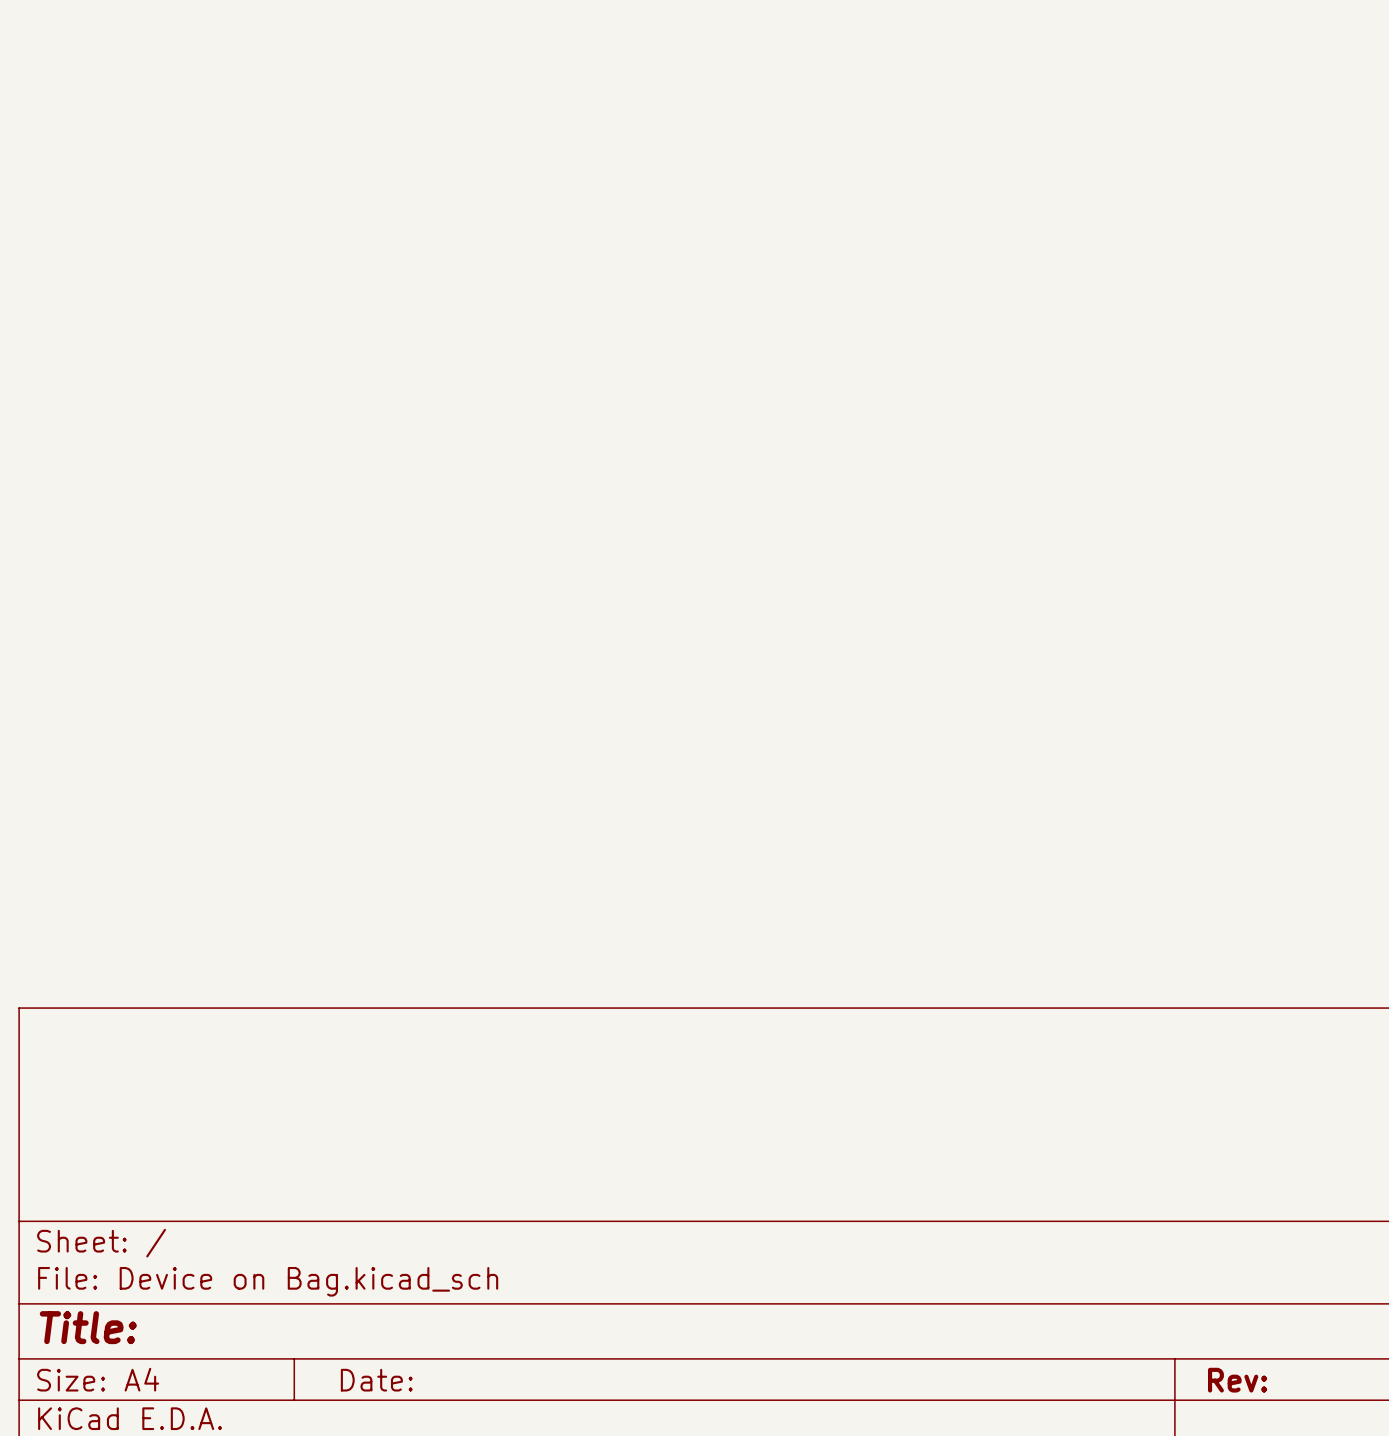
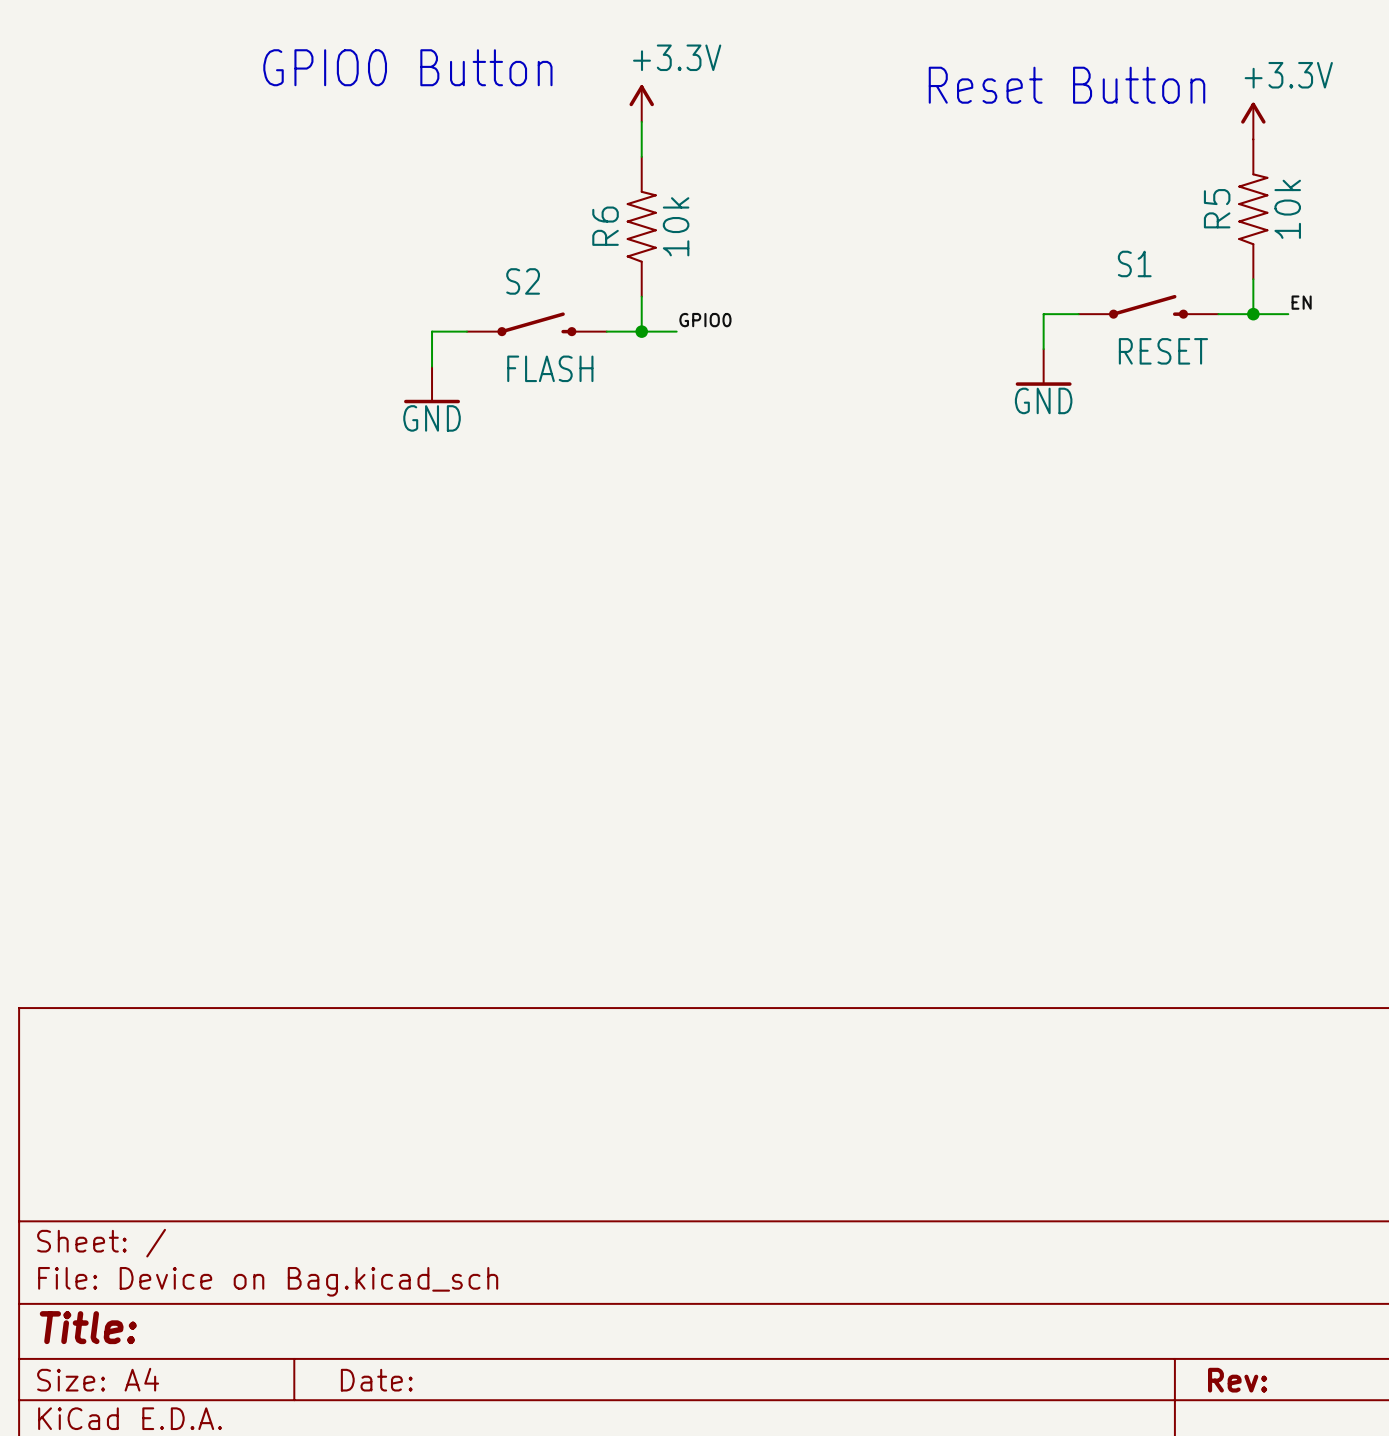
text: none -> GPIO0 Button (407, 67)
text: none -> Reset Button (1066, 85)
power symbol: none -> +3.3V (641, 103)
wire: none -> (641, 121) (641, 156)
power symbol: none -> +3.3V (1253, 121)
R5: none -> 10k (1253, 209)
R6: none -> 10k (641, 226)
wire: none -> (1253, 279) (1253, 314)
wire: none -> (641, 296) (641, 331)
label: none -> EN (1301, 302)
S1: none -> RESET (1148, 306)
wire: none -> (1078, 314) (1043, 314) (1043, 349)
wire: none -> (1218, 314) (1288, 314)
junction: none -> (1253, 314)
label: none -> GPIO0 (705, 320)
S2: none -> FLASH (536, 324)
wire: none -> (466, 331) (432, 331) (432, 366)
wire: none -> (606, 331) (676, 331)
junction: none -> (641, 331)
power symbol: none -> GND (1043, 367)
power symbol: none -> GND (432, 384)

